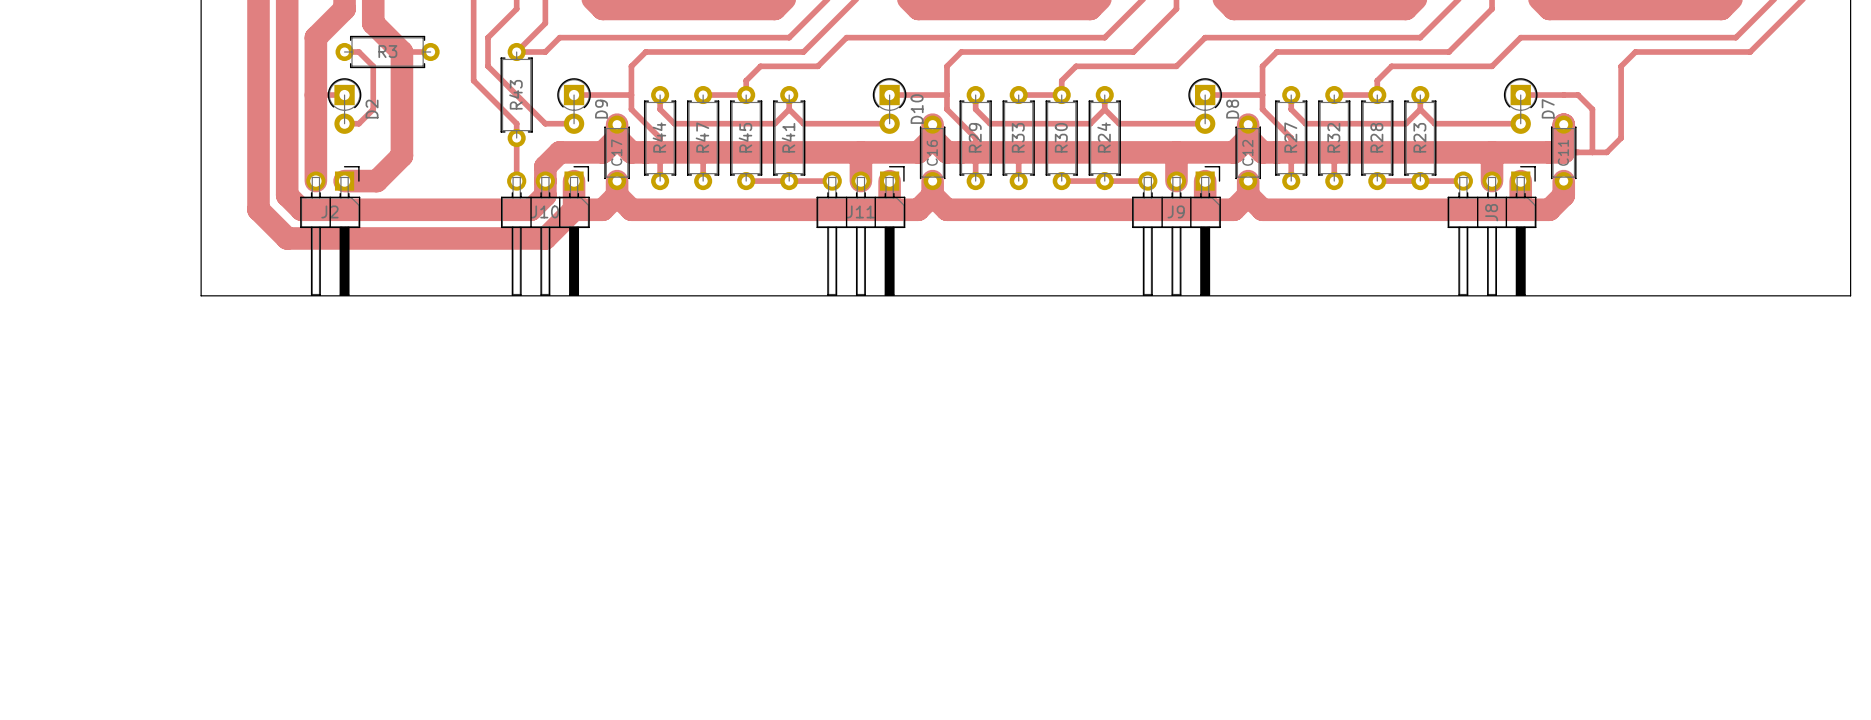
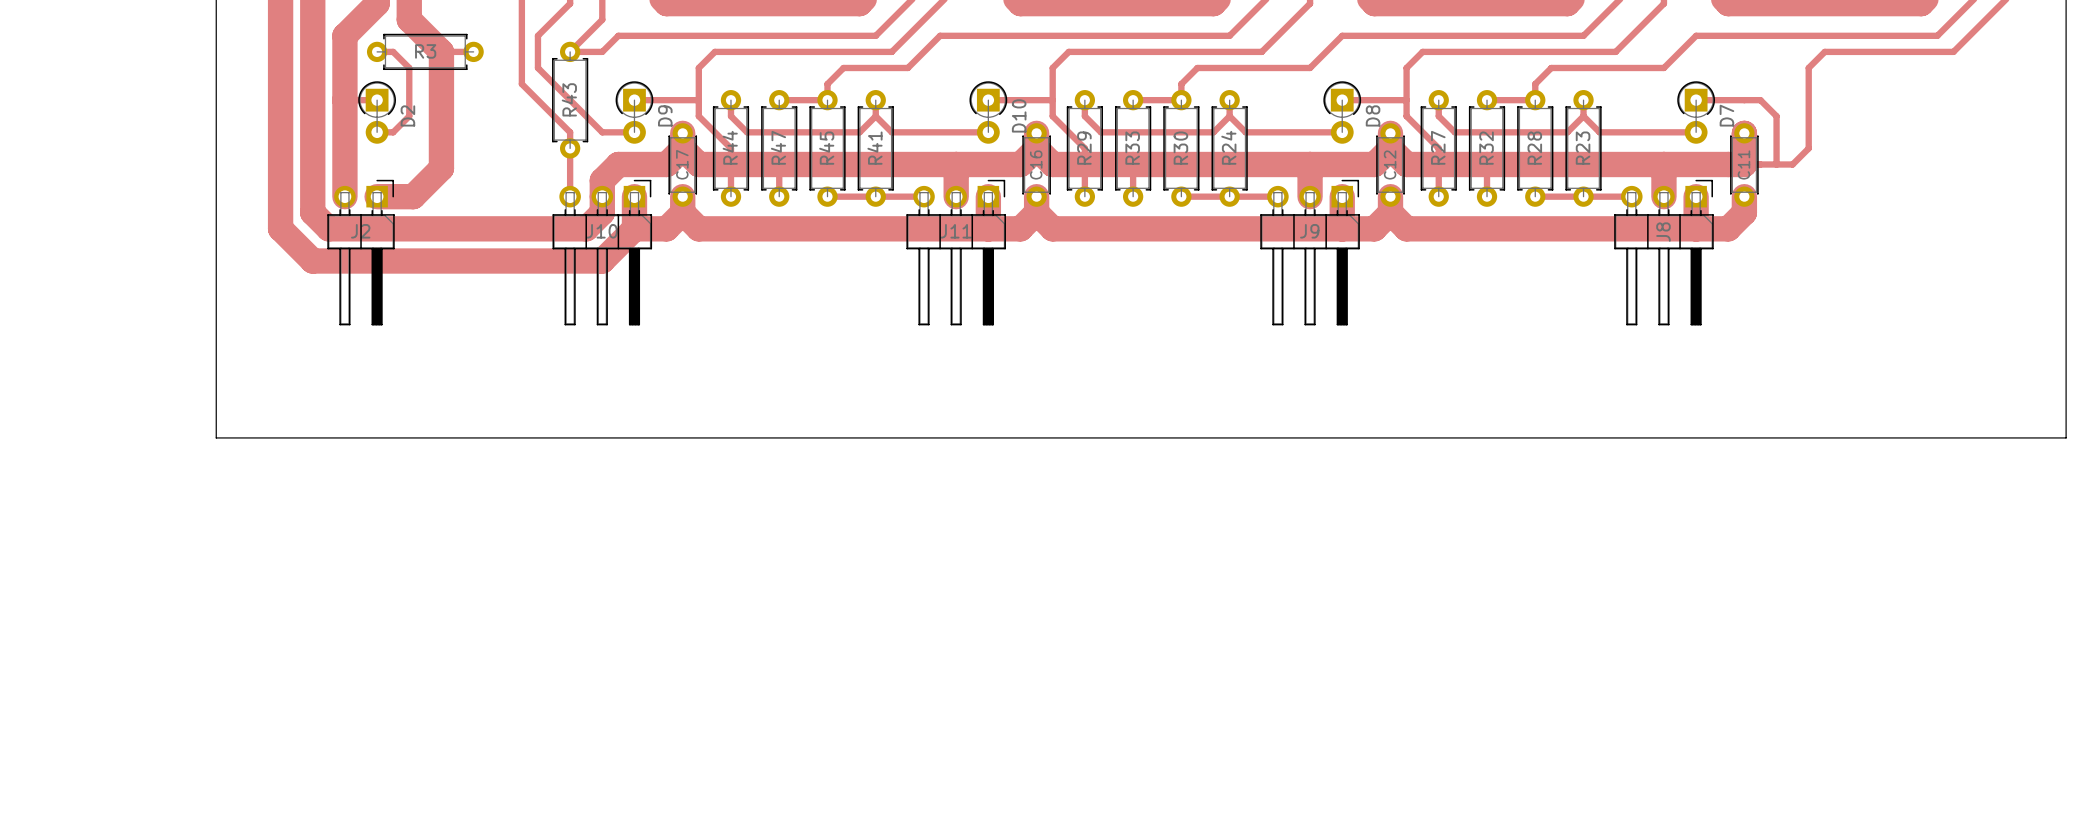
board edge: (201, 295) (1850, 295) -> (216, 325) (216, 437) (2066, 437) (2066, 325)

